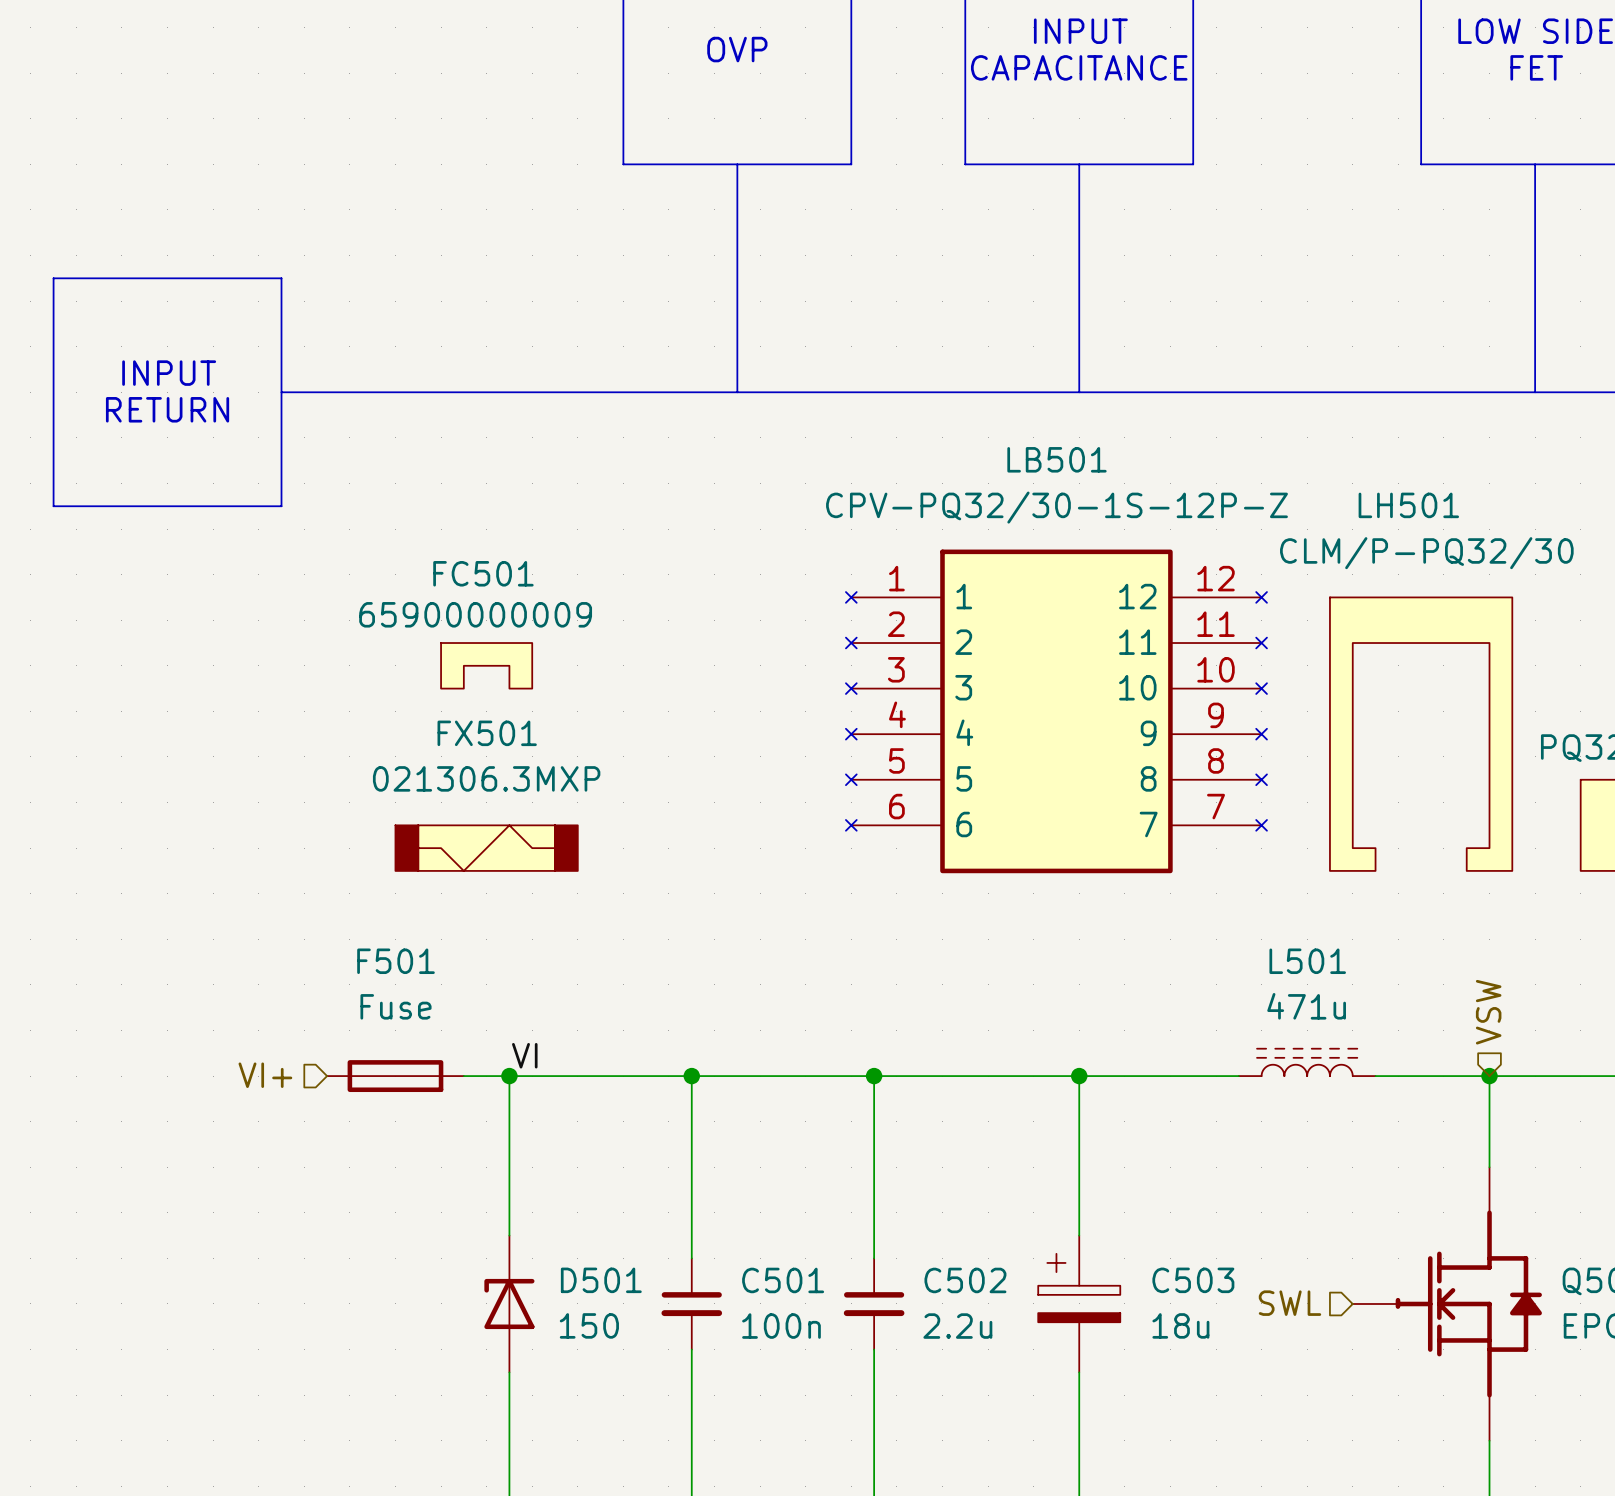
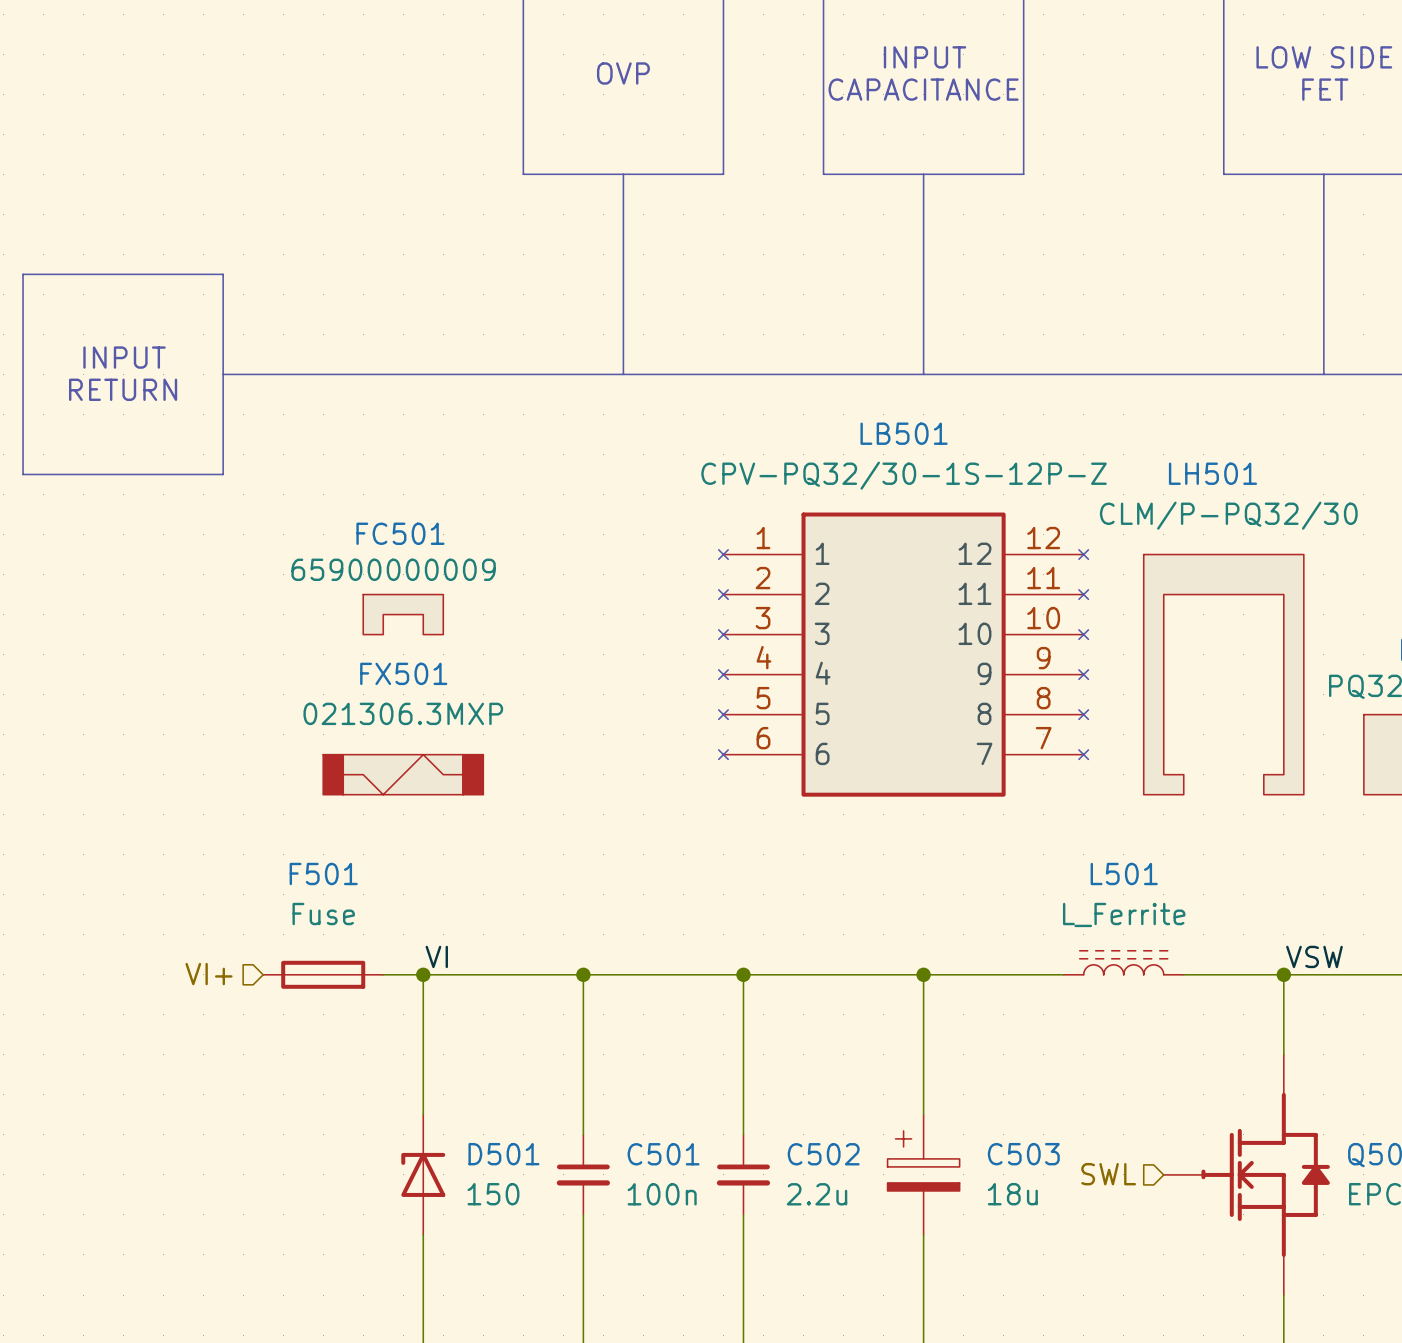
L501 value: 471u (1306, 1006) -> L_Ferrite (1124, 914)
hierarchical label: VSW (1488, 1012) -> none
label: none -> VSW (1314, 956)

